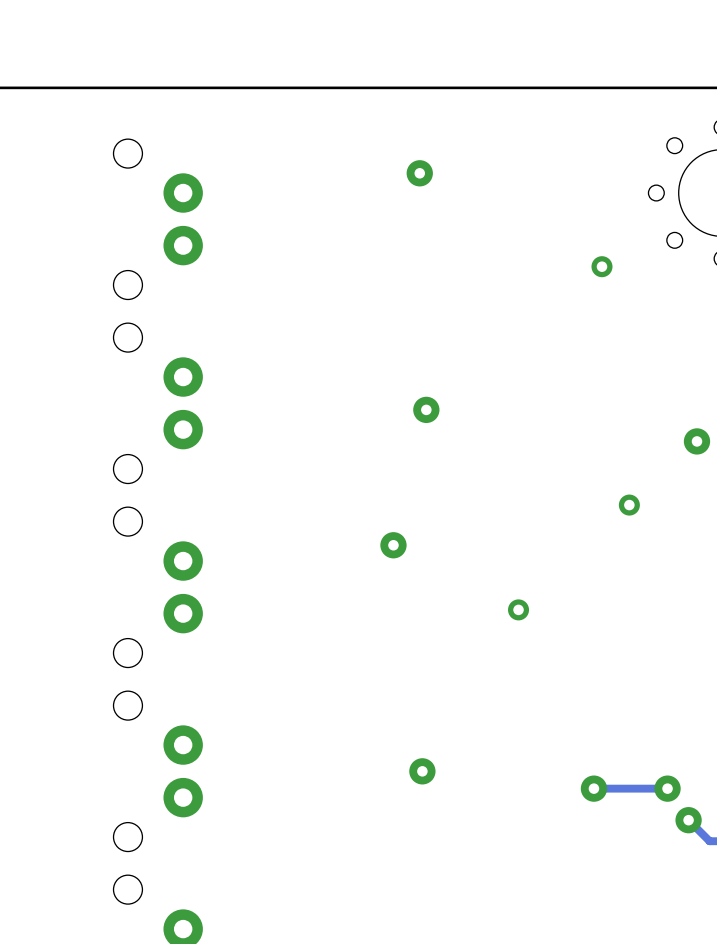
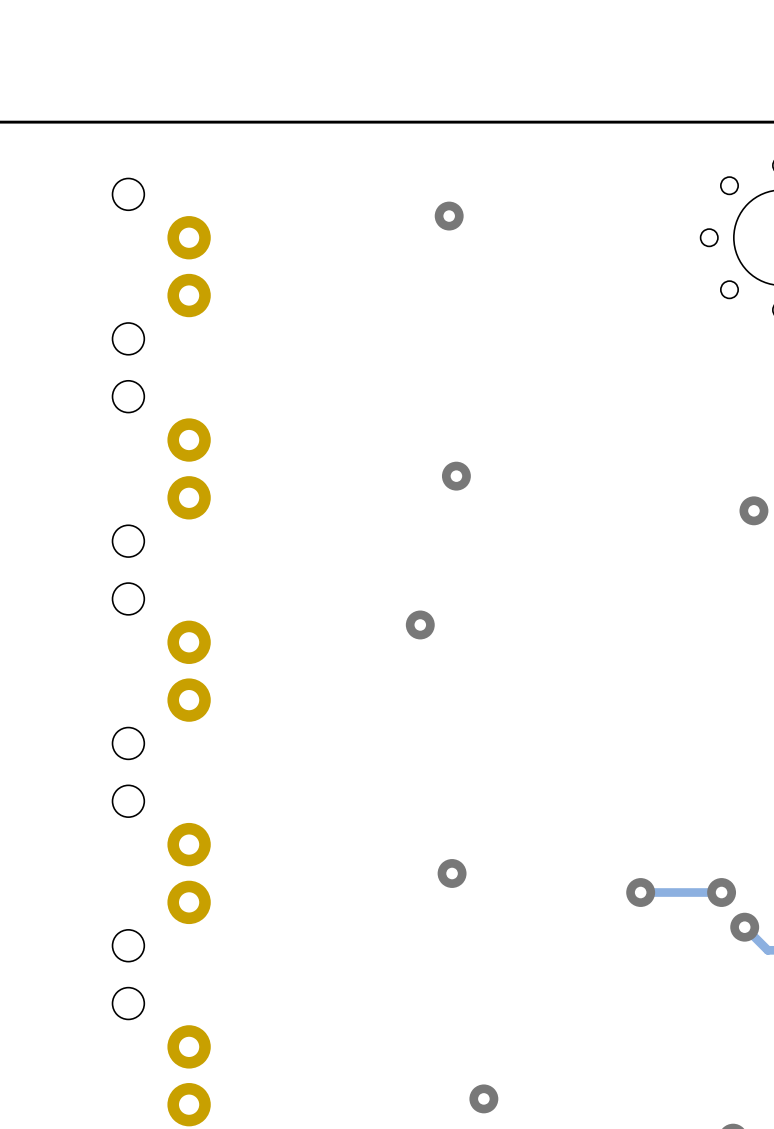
via: (601, 266) -> none
via: (629, 505) -> none
via: (518, 609) -> none

